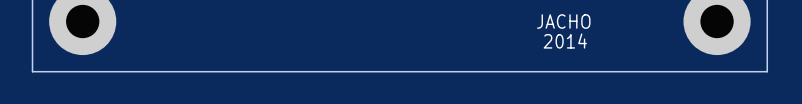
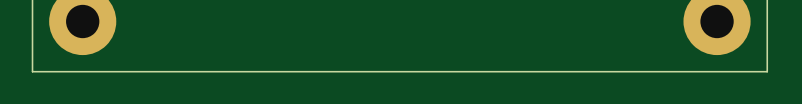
text: JACHO (563, 21) -> none
text: 2014 (565, 41) -> none

